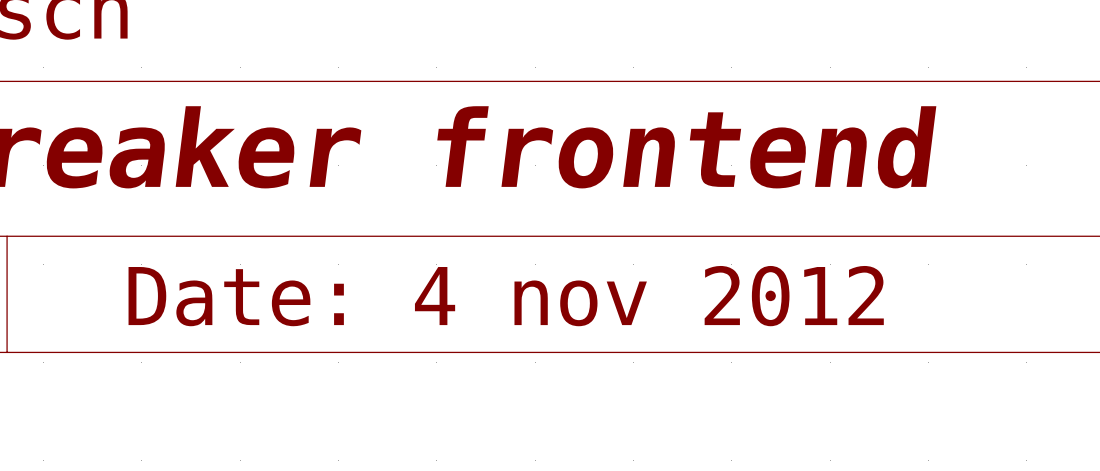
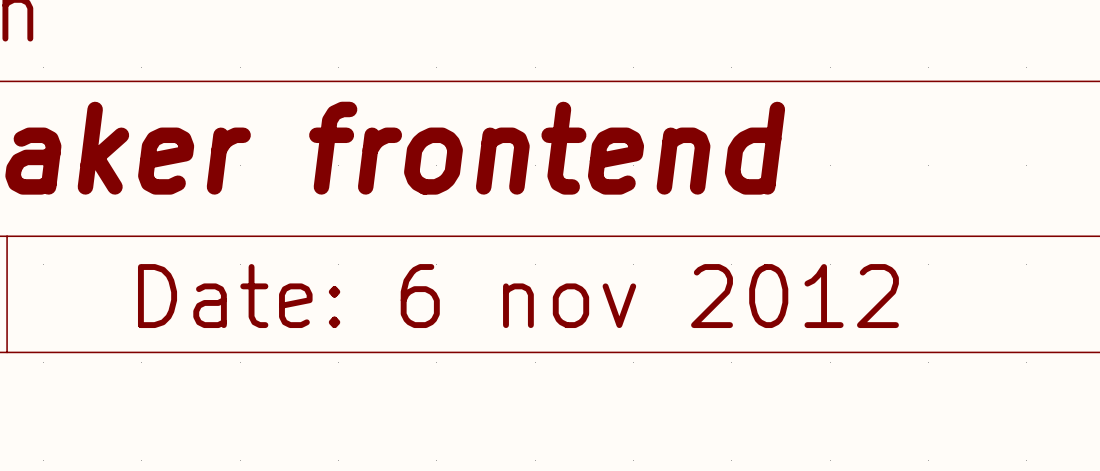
title block: Date: 4 nov 2012 (506, 296) -> Date: 6 nov 2012 (518, 296)

